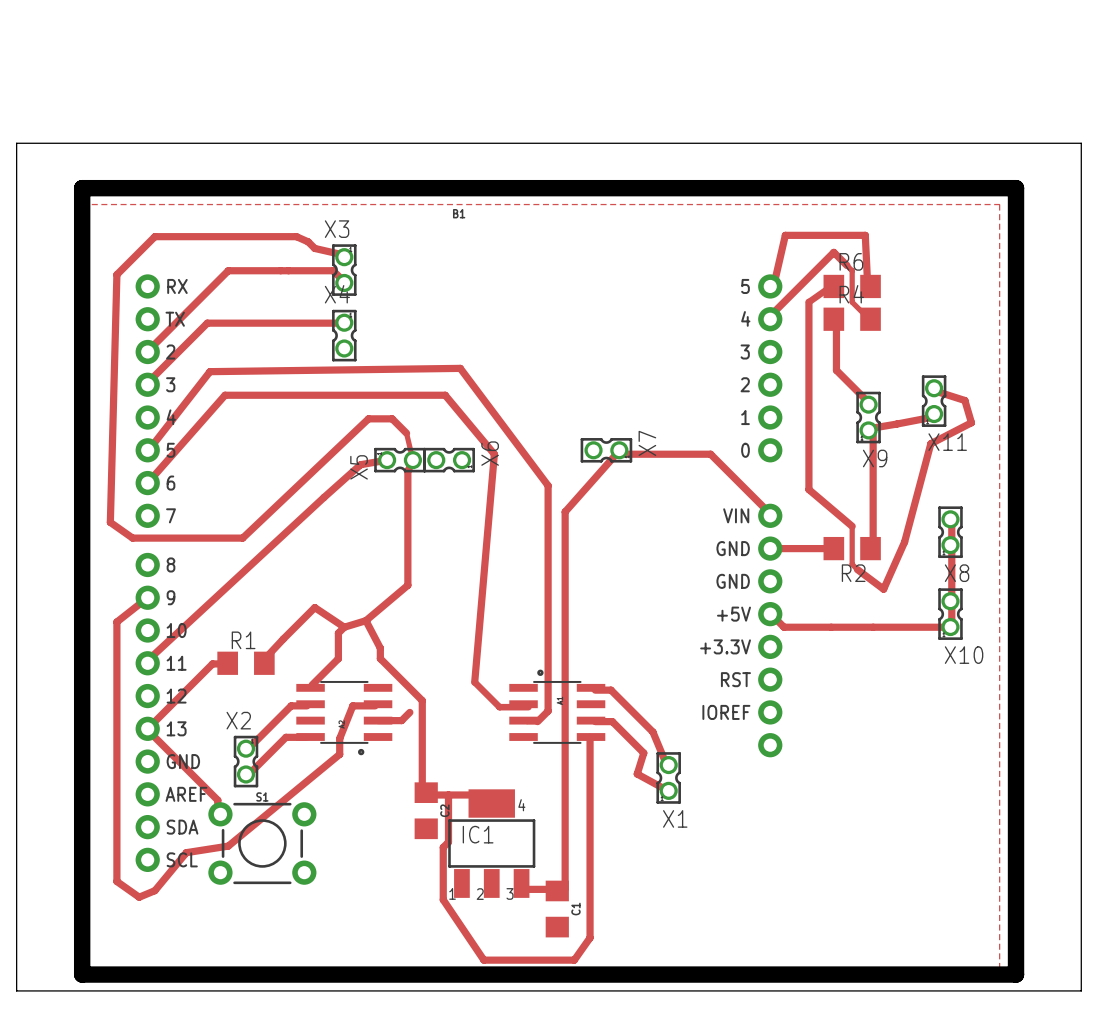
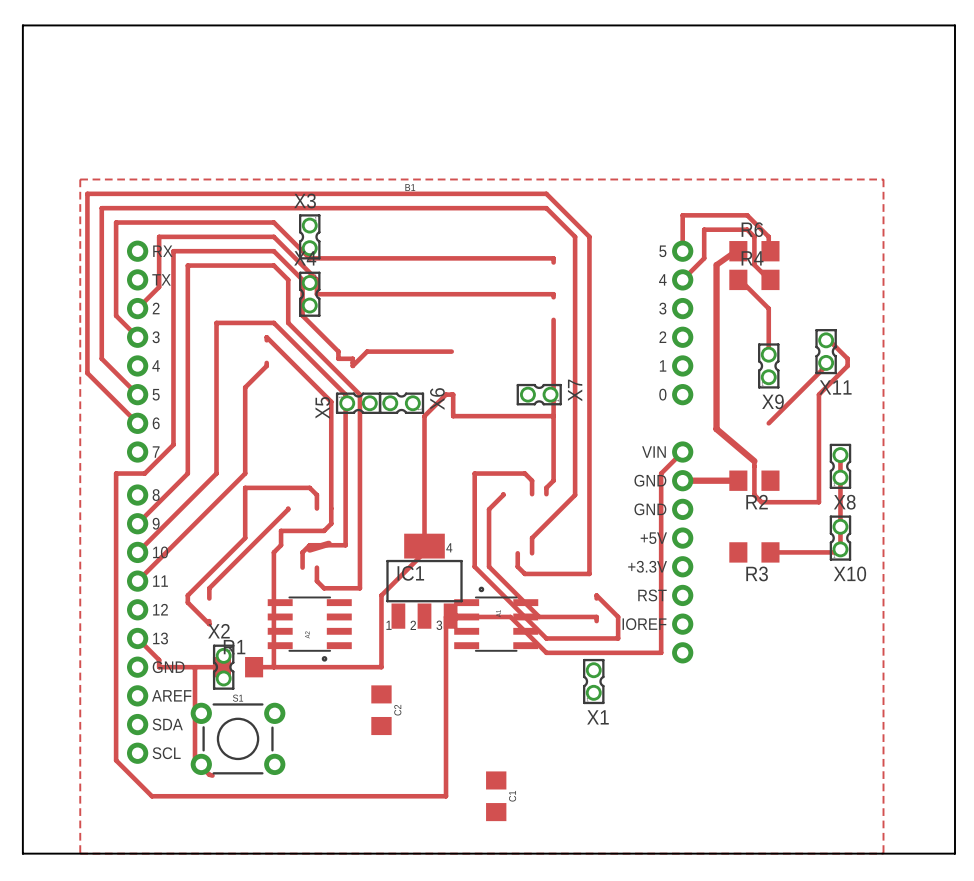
board edge: (16, 143) (1081, 143) -> (22, 125) (22, 25) (954, 25) (954, 125)
top track: (344, 257) (343, 255) (314, 248) (308, 241) (296, 236) (154, 236) (116, 274) (110, 522) (132, 538) (242, 538) (368, 418) (392, 418) (406, 433) (412, 460) (407, 471) (407, 585) (365, 620) (380, 648) (380, 658) (422, 700) (422, 789) (427, 795) (485, 795) (491, 803) -> none
top track: (852, 270) (833, 252) (774, 311) (770, 319) -> (754, 237) (747, 229) (704, 229) (704, 258) (682, 279)
top track: (344, 282) (333, 270) (228, 270) (147, 351) -> (553, 297) (553, 294) (316, 294) (316, 279) (273, 236) (159, 236) (159, 287) (137, 308)
top track: (770, 286) (773, 286) (785, 235) (865, 235) (867, 290) (868, 286) -> (682, 251) (682, 215) (747, 215) (768, 236) (768, 251)
top track: (833, 319) (836, 323) (836, 370) (868, 404) -> (738, 279) (768, 308) (768, 354)
top track: (344, 322) (207, 323) (147, 384) -> (553, 262) (553, 258) (309, 258) (273, 222) (116, 222) (116, 315) (137, 337)
top track: none -> (553, 319) (553, 480) (546, 487) (546, 494)
top track: none -> (266, 340) (266, 337) (331, 401) (331, 523) (324, 530) (281, 530) (281, 545) (273, 552) (273, 667)
top track: (934, 388) (936, 391) (964, 400) (971, 422) (930, 443) (904, 542) (883, 589) (852, 564) -> (826, 340) (826, 337) (847, 358) (847, 365) (818, 394) (818, 502) (761, 502) (754, 494)
top track: (934, 414) (930, 417) (868, 430) (873, 433) (873, 548) (870, 548) -> (826, 362) (826, 365) (768, 423)
top track: (147, 450) (209, 371) (460, 368) (548, 485) (548, 711) (537, 721) (523, 720) -> (137, 394) (101, 358) (101, 208) (546, 208) (575, 236) (575, 495) (532, 538) (532, 553)
top track: (387, 460) (360, 464) (149, 658) (147, 663) -> (266, 362) (266, 365) (245, 387) (245, 473) (137, 581)
top track: none -> (553, 416) (453, 416) (453, 394) (446, 394) (424, 416) (424, 552) (381, 595) (381, 667) (254, 667)
top track: (147, 483) (225, 395) (445, 395) (494, 454) (474, 682) (499, 707) (528, 707) (523, 704) -> (137, 423) (87, 373) (87, 193) (546, 193) (589, 236) (589, 573) (524, 573) (517, 566) (517, 553)
top track: (770, 515) (710, 454) (621, 454) (619, 450) (565, 511) (565, 889) (557, 890) (527, 889) (521, 883) -> (682, 452) (661, 473) (661, 652) (546, 652) (510, 616) (446, 616) (446, 796) (151, 796) (116, 760) (116, 473) (144, 473) (173, 444) (173, 251) (273, 251) (302, 279) (302, 315) (338, 351) (338, 358) (352, 358) (352, 365) (367, 351) (451, 351)
top track: (950, 519) (950, 627) (784, 627) (770, 614) -> (840, 455) (840, 552) (770, 552)
top track: none -> (503, 494) (489, 509) (489, 566) (539, 616) (596, 616) (596, 621)
top track: none -> (532, 494) (532, 480) (524, 473) (474, 473) (474, 566) (546, 638) (618, 638) (618, 616) (596, 595) (596, 598)
top track: none -> (288, 508) (209, 588) (209, 598)
top track: none -> (316, 508) (316, 495) (309, 487) (245, 487) (245, 538) (187, 595) (187, 602) (209, 624) (209, 621)
top track: (147, 597) (116, 621) (116, 881) (139, 897) (154, 890) (186, 852) (228, 846) (339, 754) (339, 738) (352, 705) (378, 704) -> (137, 523) (187, 473) (187, 265) (273, 265) (288, 279) (288, 322) (359, 394) (359, 588) (324, 588) (316, 581) (316, 567)
top track: none -> (137, 552) (216, 473) (216, 322) (273, 322) (345, 394) (345, 545) (309, 545) (302, 552) (302, 567)
R3: none -> (754, 552)
top track: (227, 663) (212, 663) (147, 728) (217, 800) (217, 810) (220, 814) -> none
R1 position: (246, 663) -> (238, 667)
top track: (264, 663) (265, 658) (314, 607) (344, 627) (338, 633) (338, 658) (310, 687) -> none
top track: (591, 687) (595, 690) (611, 690) (652, 732) (666, 763) (668, 765) -> none
top track: (310, 704) (291, 705) (249, 747) (246, 748) -> none
top track: (409, 712) (401, 720) (378, 720) -> none
top track: (591, 720) (612, 721) (643, 753) (637, 774) (668, 790) -> none
top track: none -> (137, 638) (159, 660) (159, 667) (221, 667)
top track: (310, 737) (285, 737) (249, 774) (246, 774) -> none
top track: (591, 737) (590, 937) (574, 960) (483, 960) (443, 899) (443, 847) (448, 842) (448, 795) -> none
top track: none -> (195, 667) (195, 760) (212, 775)
IC1 position: (491, 843) -> (424, 581)
board edge: (16, 974) (16, 990) (1081, 990) (1081, 974) -> (22, 853) (80, 853)
board edge: (82, 974) (82, 188) (1016, 188) (1016, 974) -> (954, 853) (897, 853)
board edge width: thick (82, 974) (1016, 974) -> thin (80, 853) (897, 853)

